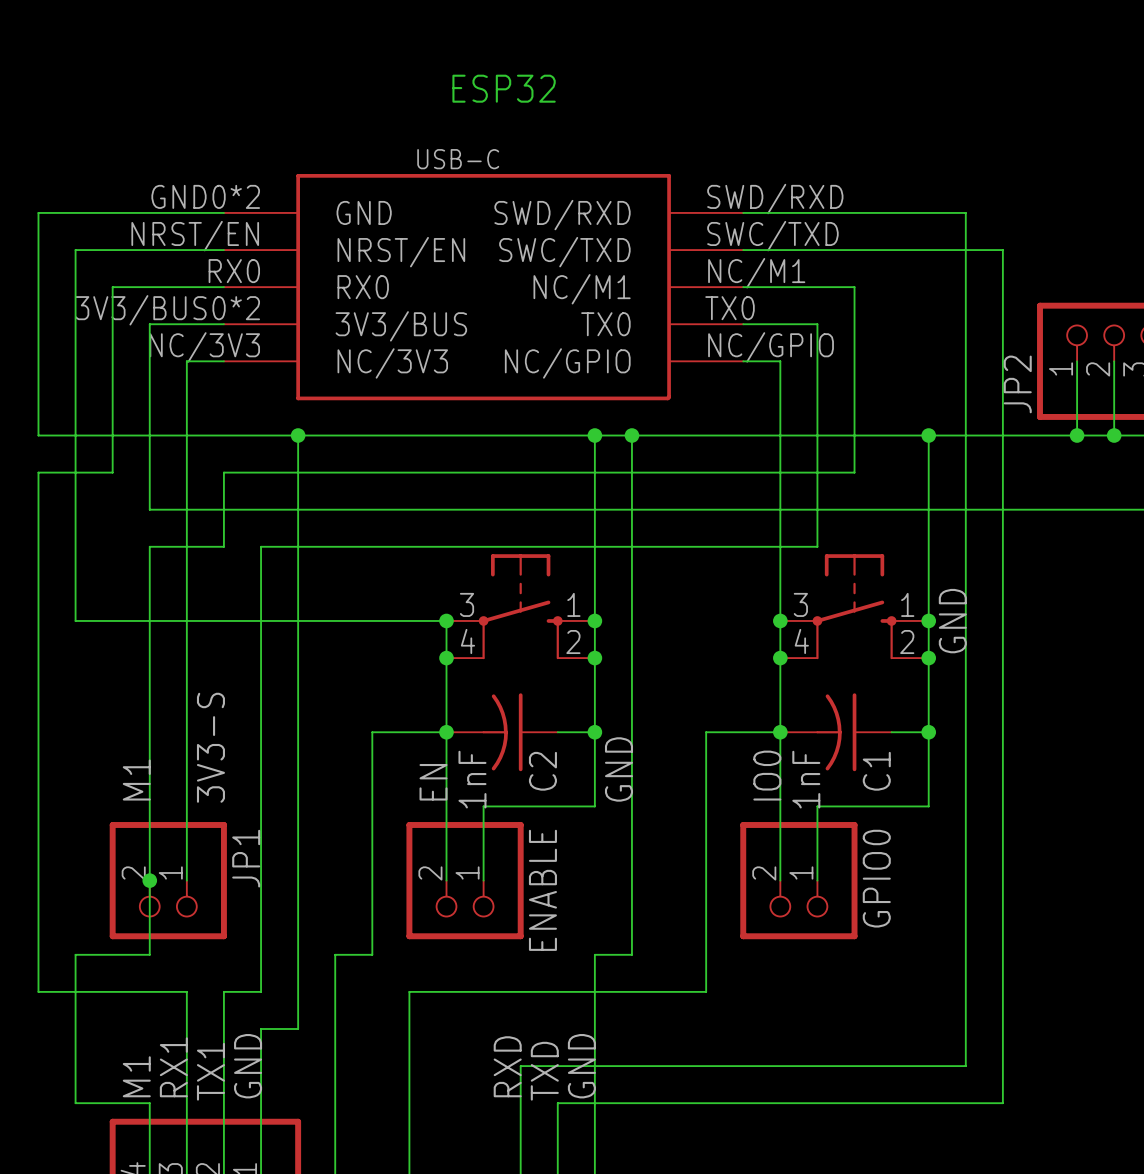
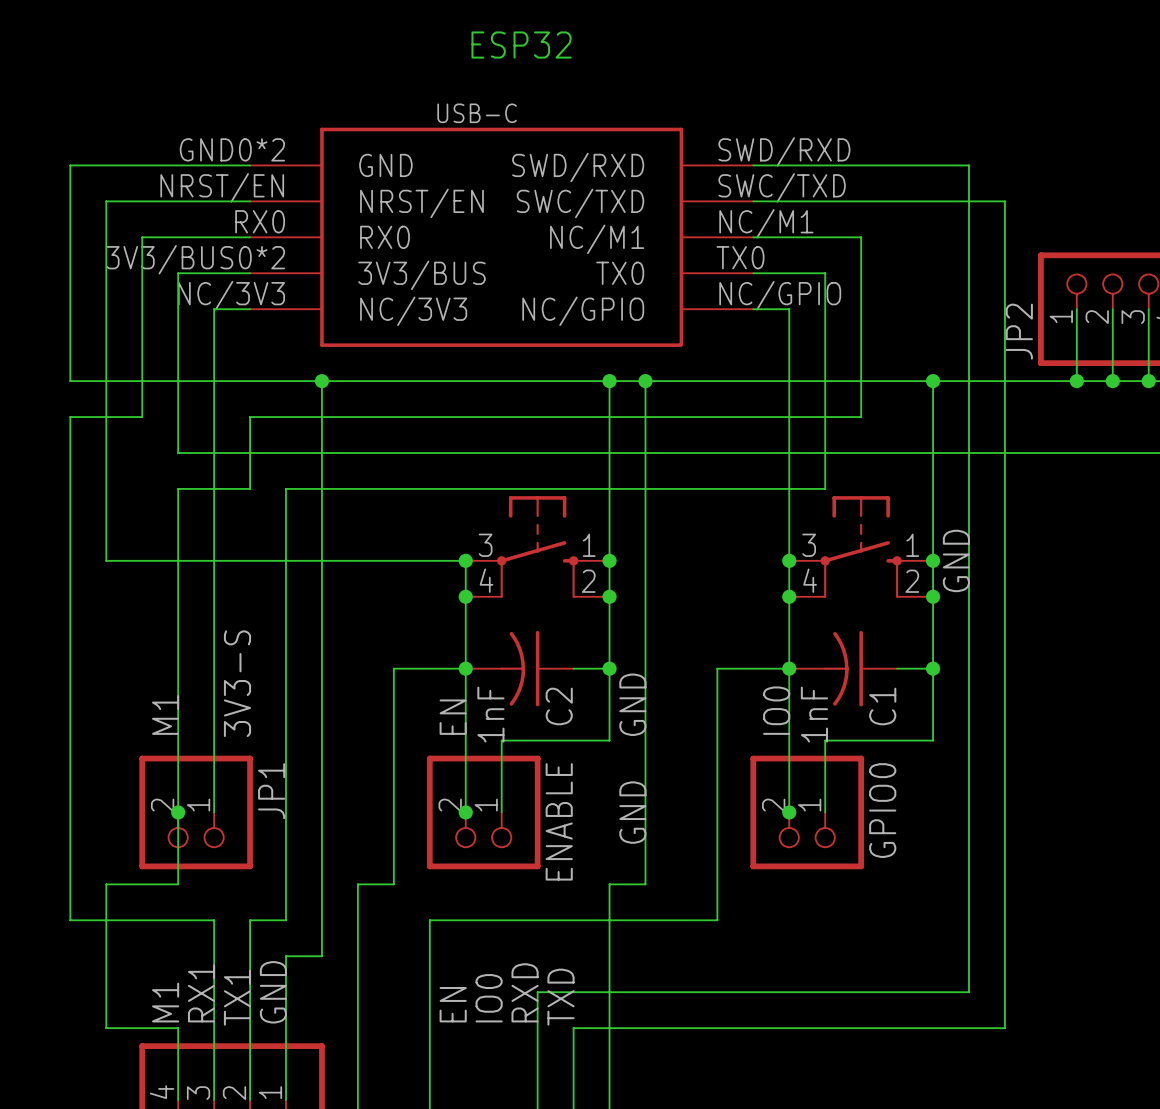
junction: none -> (465, 812)
junction: none -> (789, 812)
label position: GND (581, 1066) -> GND (632, 812)
label: none -> IO0 (489, 998)
label: none -> EN (453, 1004)

